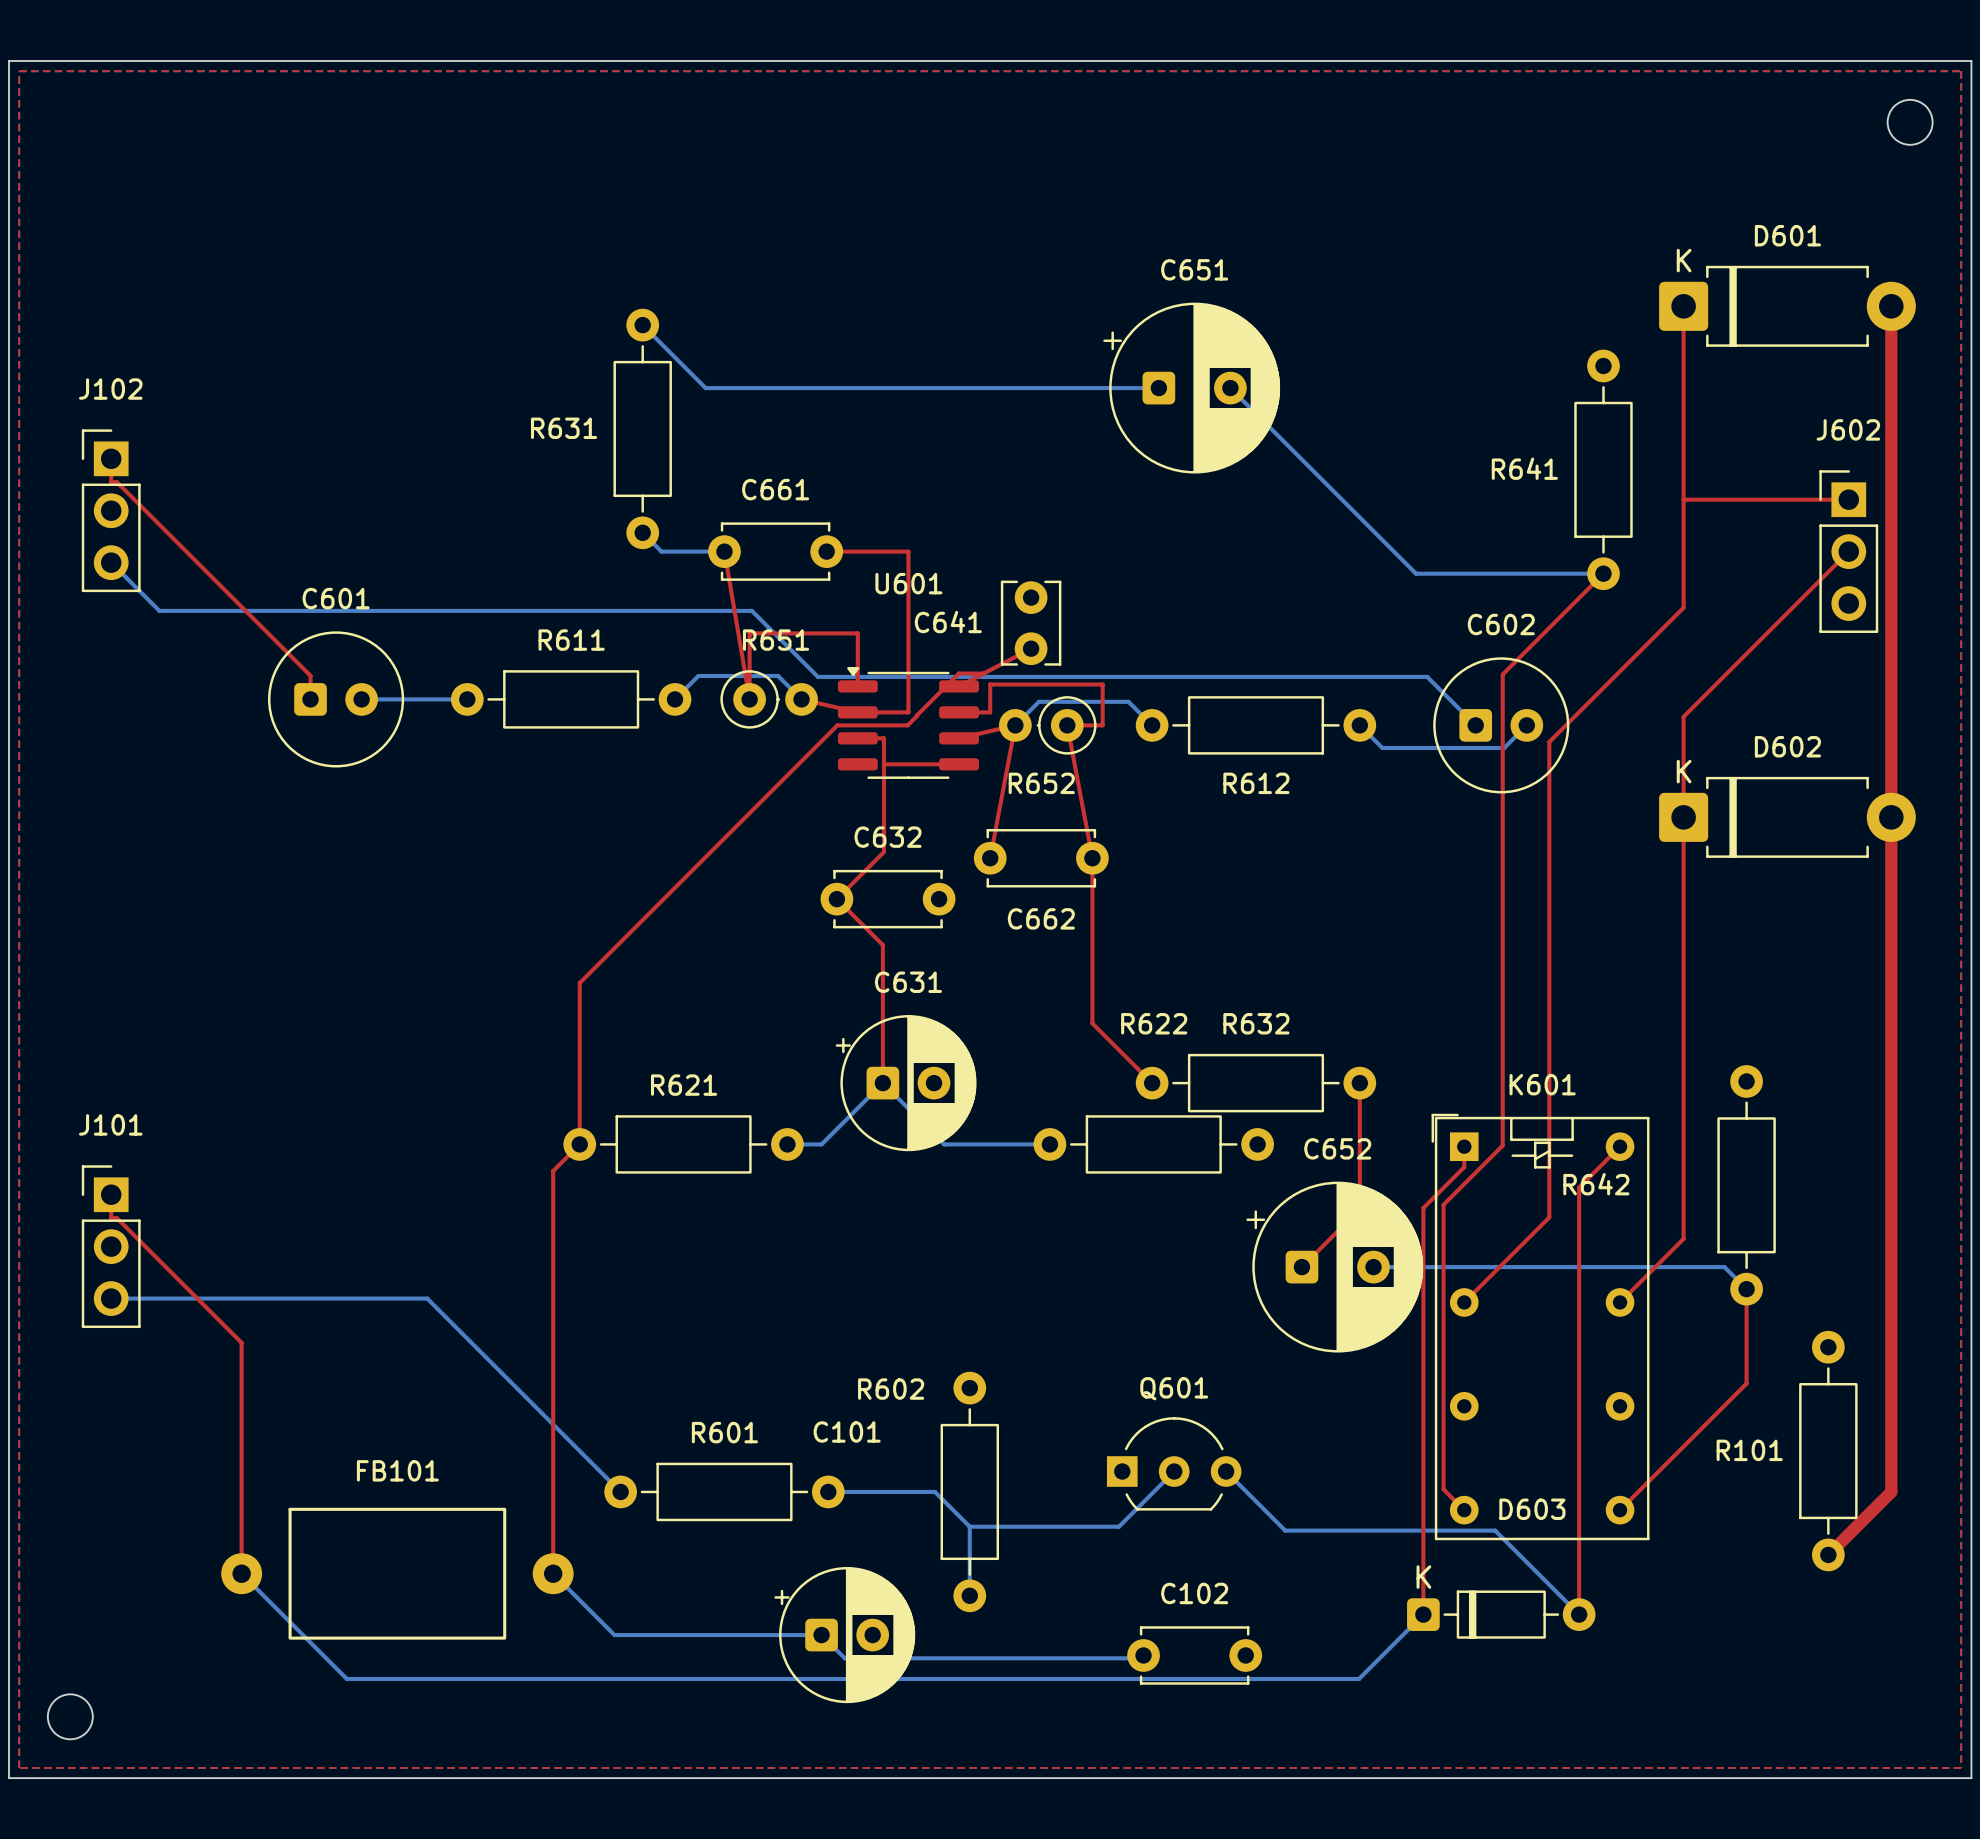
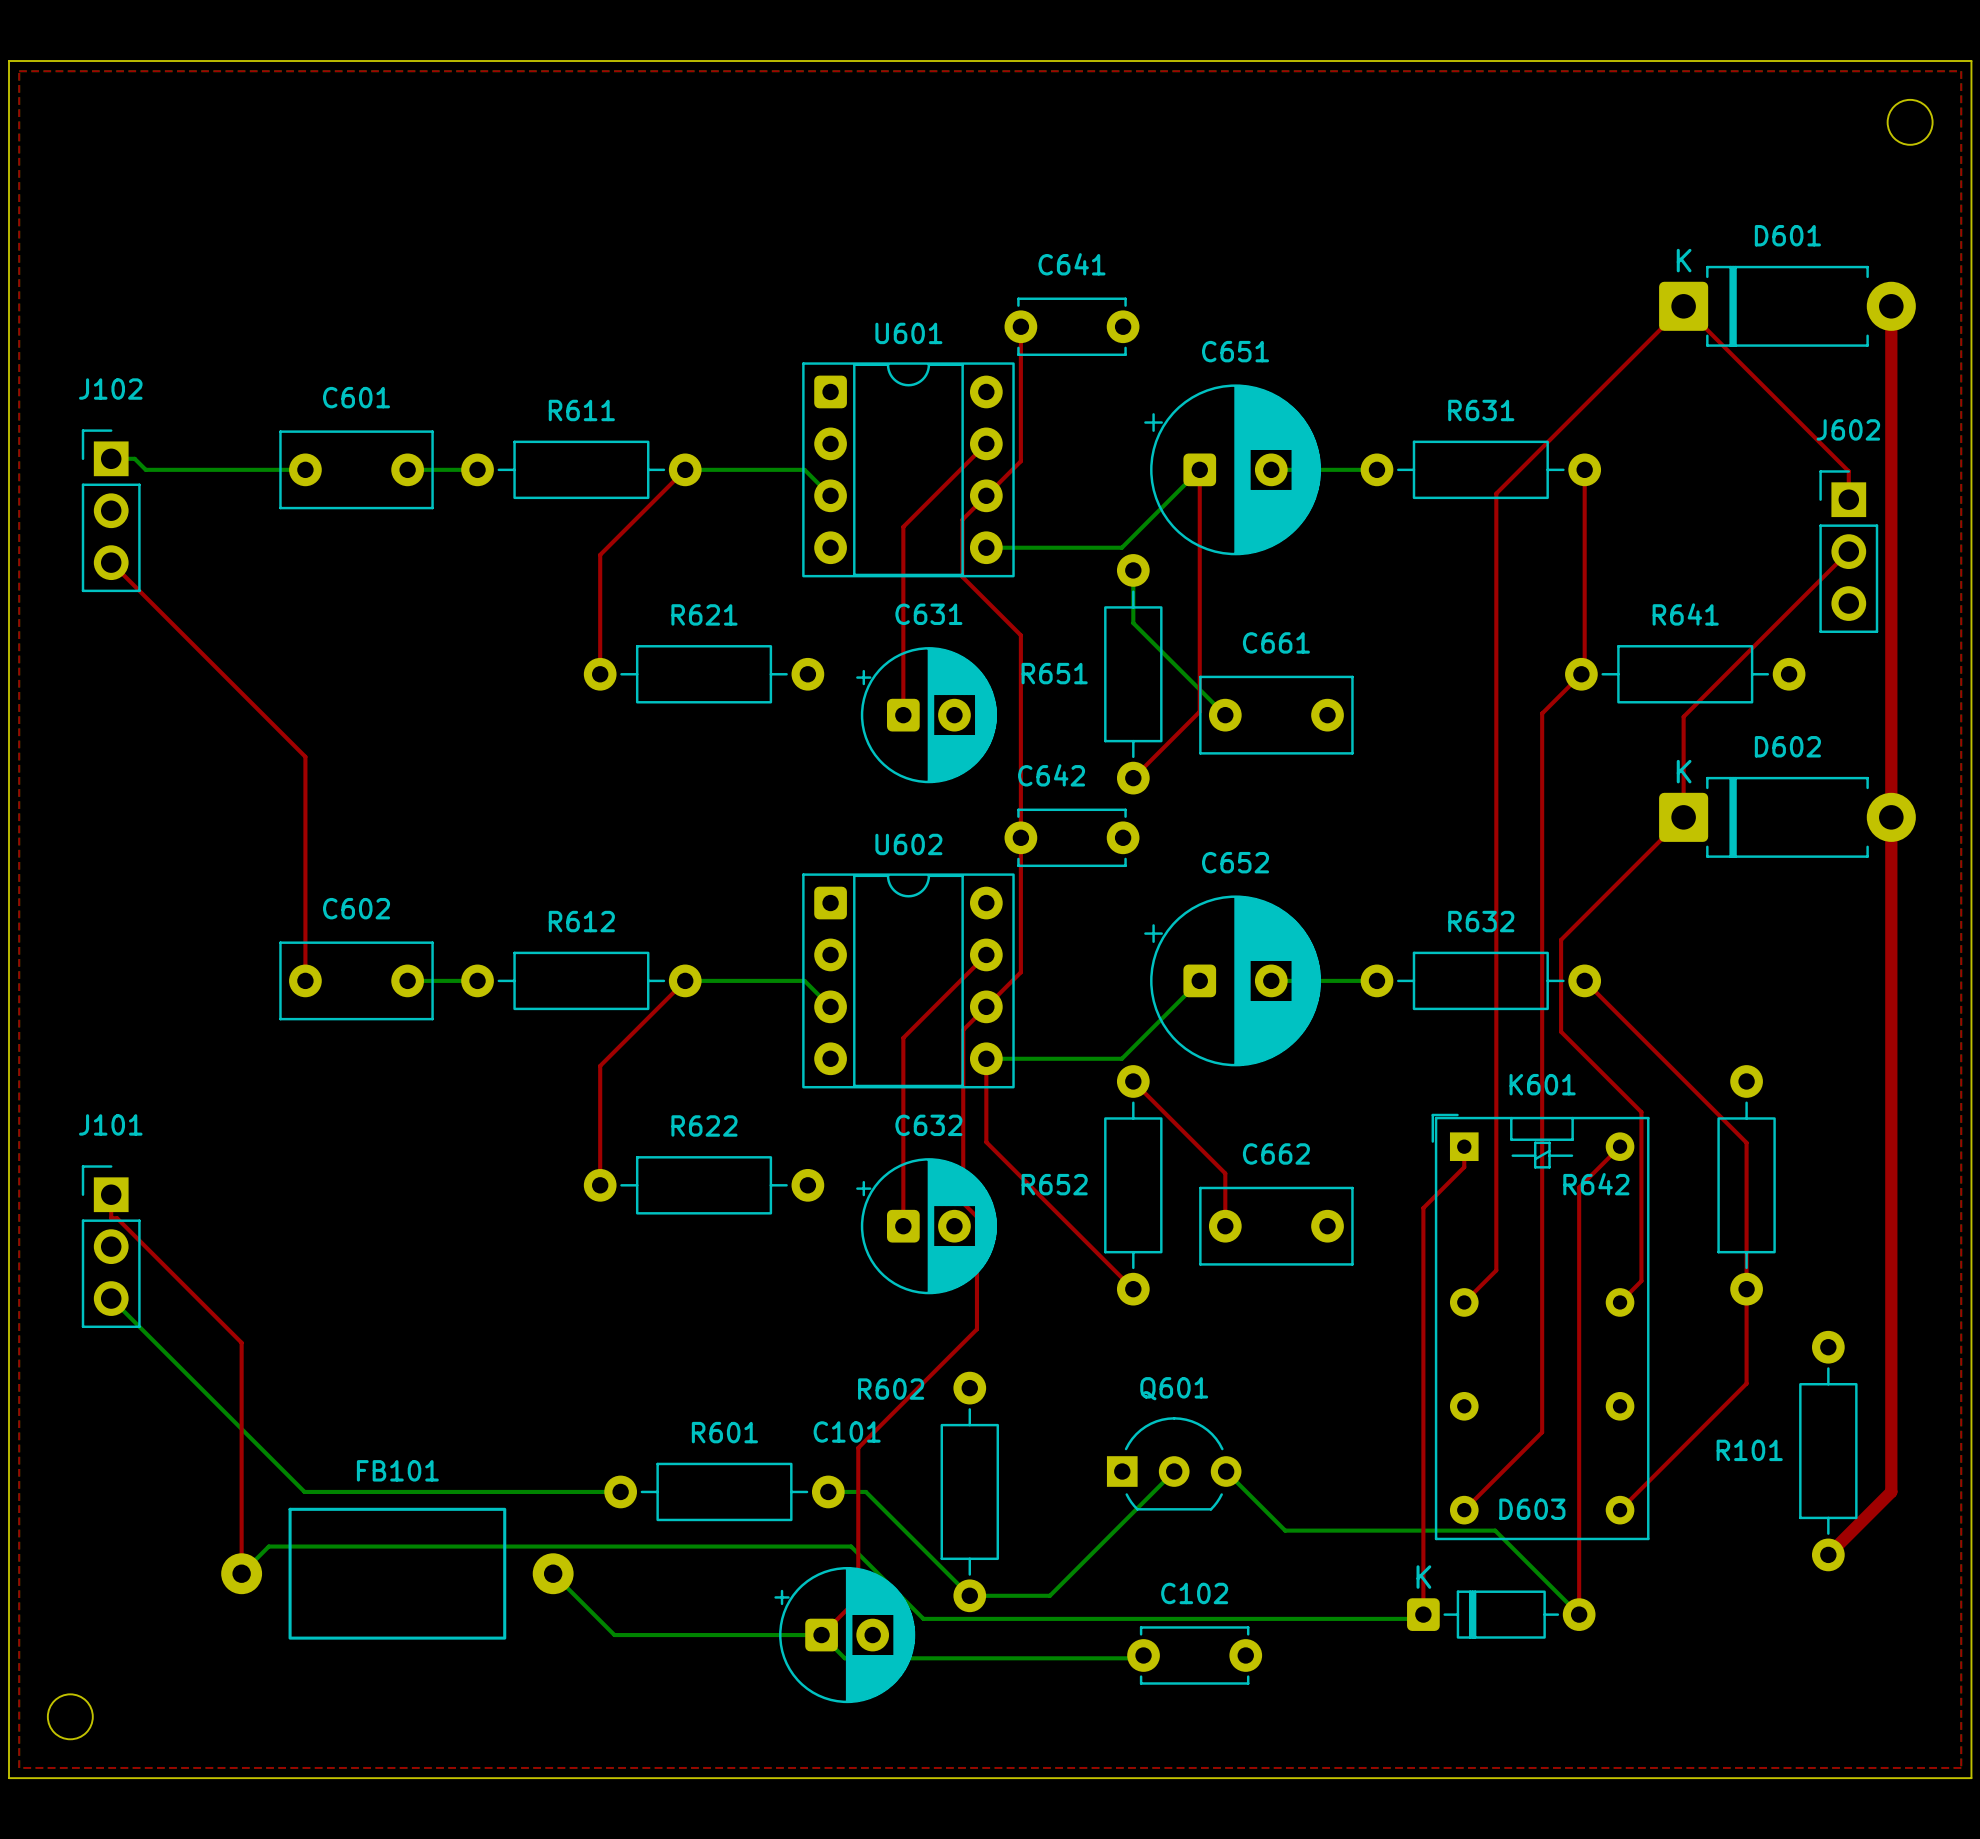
text position: C651 (1194, 269) -> C651 (1235, 351)
top track: (1683, 306) (1683, 607) (1549, 741) (1549, 1217) (1496, 1270) -> (1848, 499) (1848, 471) (1683, 306) (1496, 493) (1496, 1270)
bottom track: (642, 325) (705, 388) (1158, 388) -> none
top track: none -> (1020, 326) (1020, 461) (962, 519) (962, 576) (1020, 635) (1020, 972) (963, 1029) (963, 1203) (976, 1216) (976, 1329) (858, 1447) (858, 1598) (821, 1635)
part: none -> (1071, 326)
part position: (1191, 388) -> (1232, 469)
bottom track: (1230, 388) (1416, 573) (1603, 573) -> none
text: none -> R631 (1481, 410)
text: R631 (564, 428) -> none
part rotation: 0° (642, 428) -> 90° clockwise (581, 469)
top track: none -> (986, 443) (903, 526) (903, 715)
top track: (111, 458) (111, 482) (117, 482) (310, 675) (310, 699) -> none
bottom track: none -> (111, 458) (134, 458) (145, 469) (305, 469)
text position: R641 (1524, 468) -> R641 (1685, 614)
part: none -> (356, 469)
bottom track: none -> (407, 469) (477, 469)
top track: none -> (685, 469) (600, 554) (600, 674)
bottom track: none -> (685, 469) (804, 469) (830, 495)
part: none -> (908, 469)
top track: none -> (1199, 469) (1199, 711) (1133, 778)
bottom track: none -> (1199, 469) (1121, 547) (986, 547)
bottom track: none -> (1271, 469) (1376, 469)
part: none -> (1480, 469)
part: (1603, 469) -> none
text: C661 (775, 489) -> none
top track: (1683, 499) (1848, 499) -> none
bottom track: (642, 532) (661, 551) (724, 551) -> none
top track: (724, 551) (749, 699) (749, 633) (857, 633) (857, 686) -> none
part: (775, 551) -> none
top track: (826, 551) (908, 551) (908, 712) (857, 712) (801, 699) -> none
top track: none -> (111, 562) (305, 756) (305, 980)
bottom track: (111, 562) (159, 610) (751, 610) (817, 676) (1427, 676) (1475, 725) -> none
bottom track: none -> (1133, 570) (1133, 623) (1225, 715)
top track: (1603, 573) (1502, 674) (1502, 1145) (1443, 1204) (1443, 1489) (1464, 1510) -> (1584, 469) (1584, 671) (1542, 713) (1542, 1432) (1464, 1510)
text position: U601 (908, 583) -> U601 (908, 333)
text position: C601 (336, 598) -> C601 (356, 397)
text position: C641 (948, 622) -> C641 (1071, 264)
part: (1031, 623) -> none
text: C602 (1501, 624) -> none
text position: R611 (571, 640) -> R611 (581, 410)
text position: R651 (776, 640) -> R651 (1054, 673)
text: none -> C661 (1276, 642)
top track: (1031, 648) (959, 686) -> none
part footprint: [837, 667, 979, 779] -> [856, 647, 997, 784]
top track: (983, 673) (958, 673) (907, 725) (837, 725) (579, 983) (579, 1144) (553, 1171) (553, 1573) -> none
part: none -> (704, 674)
part: none -> (1685, 674)
part: (336, 699) -> none
bottom track: (361, 699) (467, 699) -> none
part: (571, 699) -> none
bottom track: (675, 699) (698, 675) (778, 675) (801, 699) -> none
part: (769, 699) -> none
top track: (959, 712) (990, 712) (990, 684) (1102, 684) (1102, 725) (1067, 725) (1092, 858) (1092, 1023) (1152, 1083) -> none
part: none -> (1276, 715)
bottom track: (1015, 725) (1038, 701) (1128, 701) (1152, 725) -> none
part: (1047, 725) -> none
part rotation: 0° (1255, 725) -> 90° clockwise (1133, 674)
bottom track: (1359, 725) (1382, 747) (1504, 747) (1526, 725) -> none
part: (1501, 725) -> none
top track: (857, 738) (883, 738) (883, 852) (836, 899) (882, 945) (882, 1083) -> none
top track: (959, 738) (1015, 725) (990, 858) -> none
top track: (883, 764) (959, 764) -> none
text: none -> C642 (1051, 775)
text position: R652 (1041, 783) -> R652 (1054, 1184)
text: R612 (1256, 783) -> none
top track: (1683, 817) (1683, 1238) (1641, 1281) -> (1683, 817) (1561, 939) (1561, 1031) (1641, 1112) (1641, 1281)
text position: C632 (888, 837) -> C632 (928, 1125)
text: none -> U602 (908, 844)
part position: (1041, 858) -> (1071, 837)
part: (888, 899) -> none
text: none -> C602 (356, 908)
text position: C662 (1041, 918) -> C662 (1276, 1153)
text: none -> R612 (581, 921)
top track: none -> (986, 954) (903, 1037) (903, 1226)
part: none -> (356, 980)
bottom track: none -> (407, 980) (477, 980)
part: none -> (581, 980)
top track: none -> (685, 980) (600, 1065) (600, 1185)
bottom track: none -> (685, 980) (804, 980) (830, 1006)
part: none -> (908, 980)
bottom track: none -> (1199, 980) (1121, 1058) (986, 1058)
part: none -> (1232, 980)
bottom track: none -> (1271, 980) (1376, 980)
part: none -> (1480, 980)
top track: none -> (1584, 980) (1746, 1142) (1746, 1289)
text position: C631 (908, 982) -> C631 (928, 614)
text position: R622 (1154, 1023) -> R622 (704, 1125)
text position: R632 (1256, 1023) -> R632 (1481, 921)
top track: none -> (986, 1058) (986, 1142) (1133, 1289)
top track: none -> (1133, 1081) (1225, 1173) (1225, 1226)
part position: (906, 1083) -> (926, 1226)
part: (1255, 1083) -> none
top track: (1359, 1083) (1359, 1209) (1301, 1267) -> none
text position: R621 (684, 1085) -> R621 (704, 614)
part position: (683, 1144) -> (704, 1185)
bottom track: (787, 1144) (821, 1144) (882, 1083) (944, 1144) (1049, 1144) -> none
part rotation: 0° (1153, 1144) -> 90° clockwise (1133, 1185)
text position: C652 (1337, 1148) -> C652 (1235, 862)
part: none -> (1276, 1226)
part: (1334, 1267) -> none
bottom track: (1373, 1267) (1724, 1267) (1746, 1289) -> none
bottom track: (111, 1298) (427, 1298) (620, 1491) -> (111, 1298) (304, 1491) (620, 1491)
bottom track: (865, 1491) (935, 1491) (969, 1526) -> none
bottom track: (969, 1526) (1118, 1526) -> (865, 1491) (969, 1595) (1049, 1595) (1118, 1526)
bottom track: (969, 1526) (969, 1595) -> none
bottom track: (241, 1573) (346, 1678) (1359, 1678) (1419, 1618) -> (241, 1573) (268, 1546) (851, 1546) (923, 1618) (1419, 1618)

